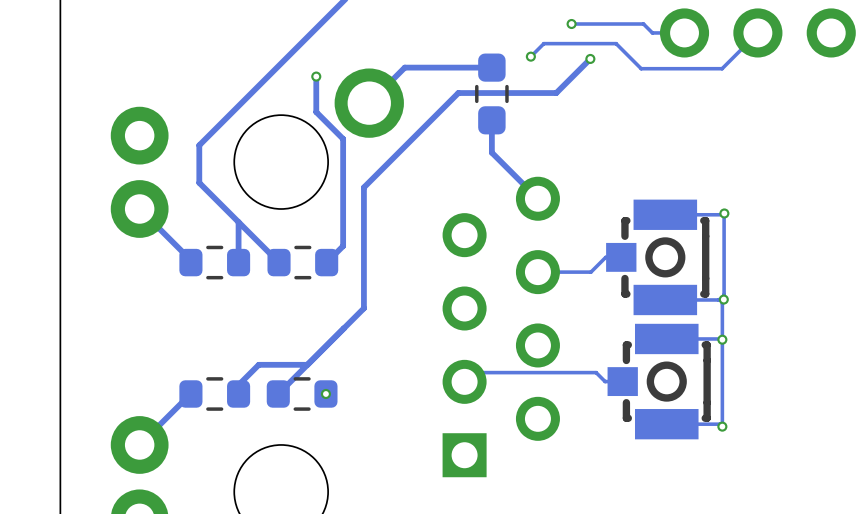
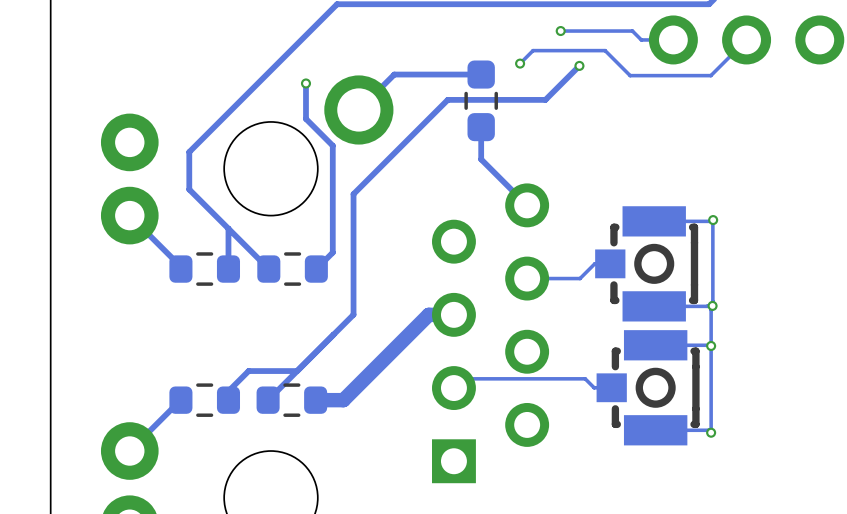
track: none -> (453, 314) (428, 314) (343, 400) (315, 400)
via: (325, 393) -> none

